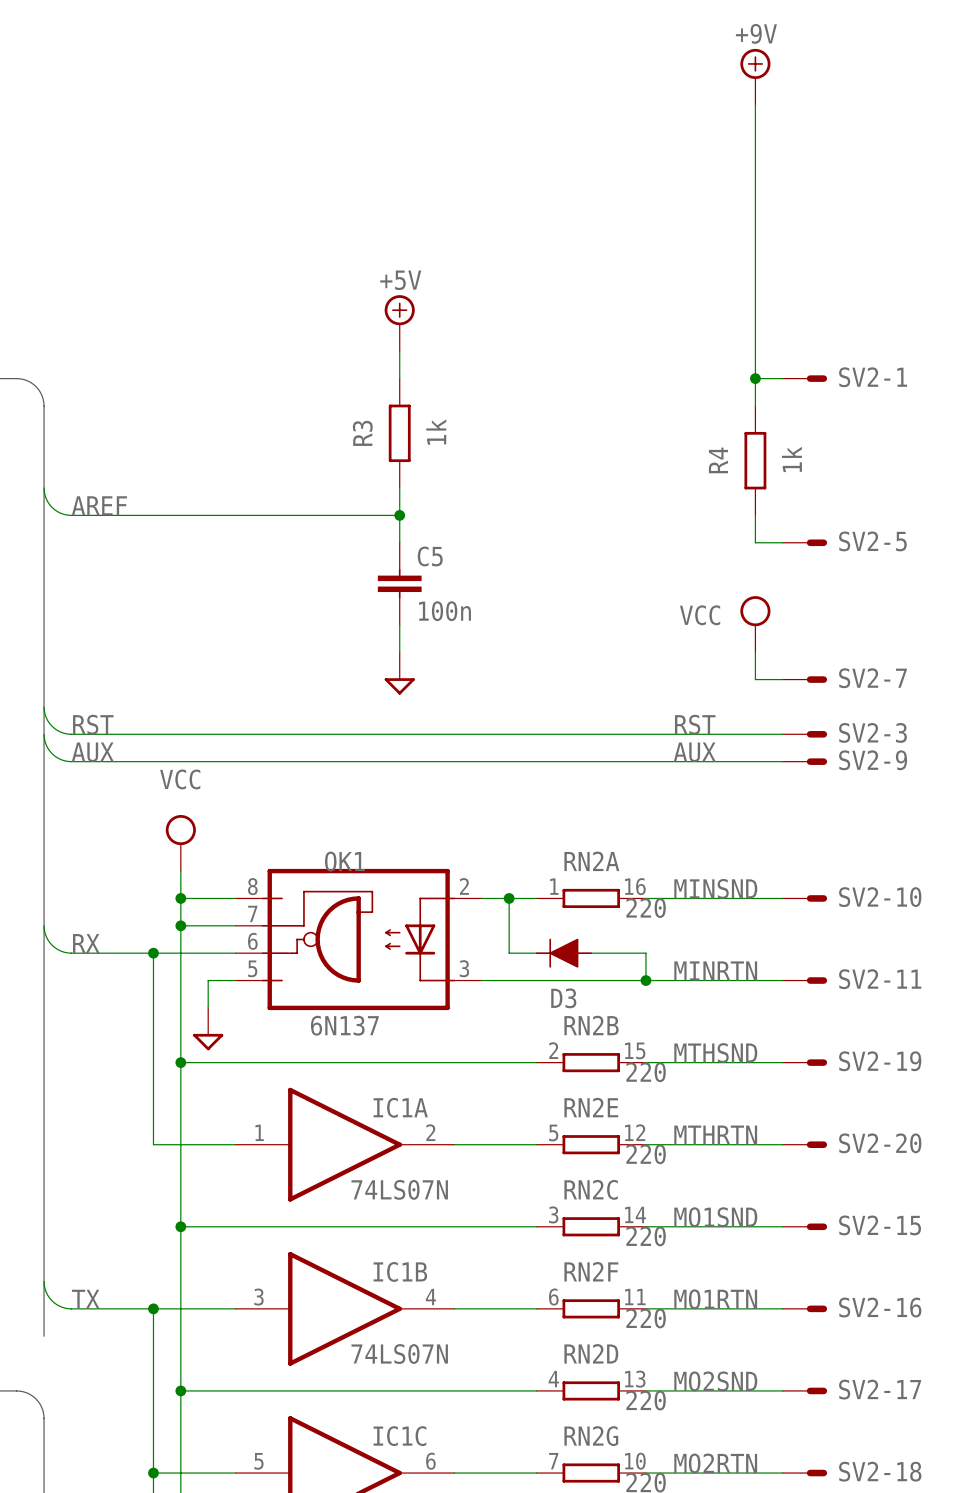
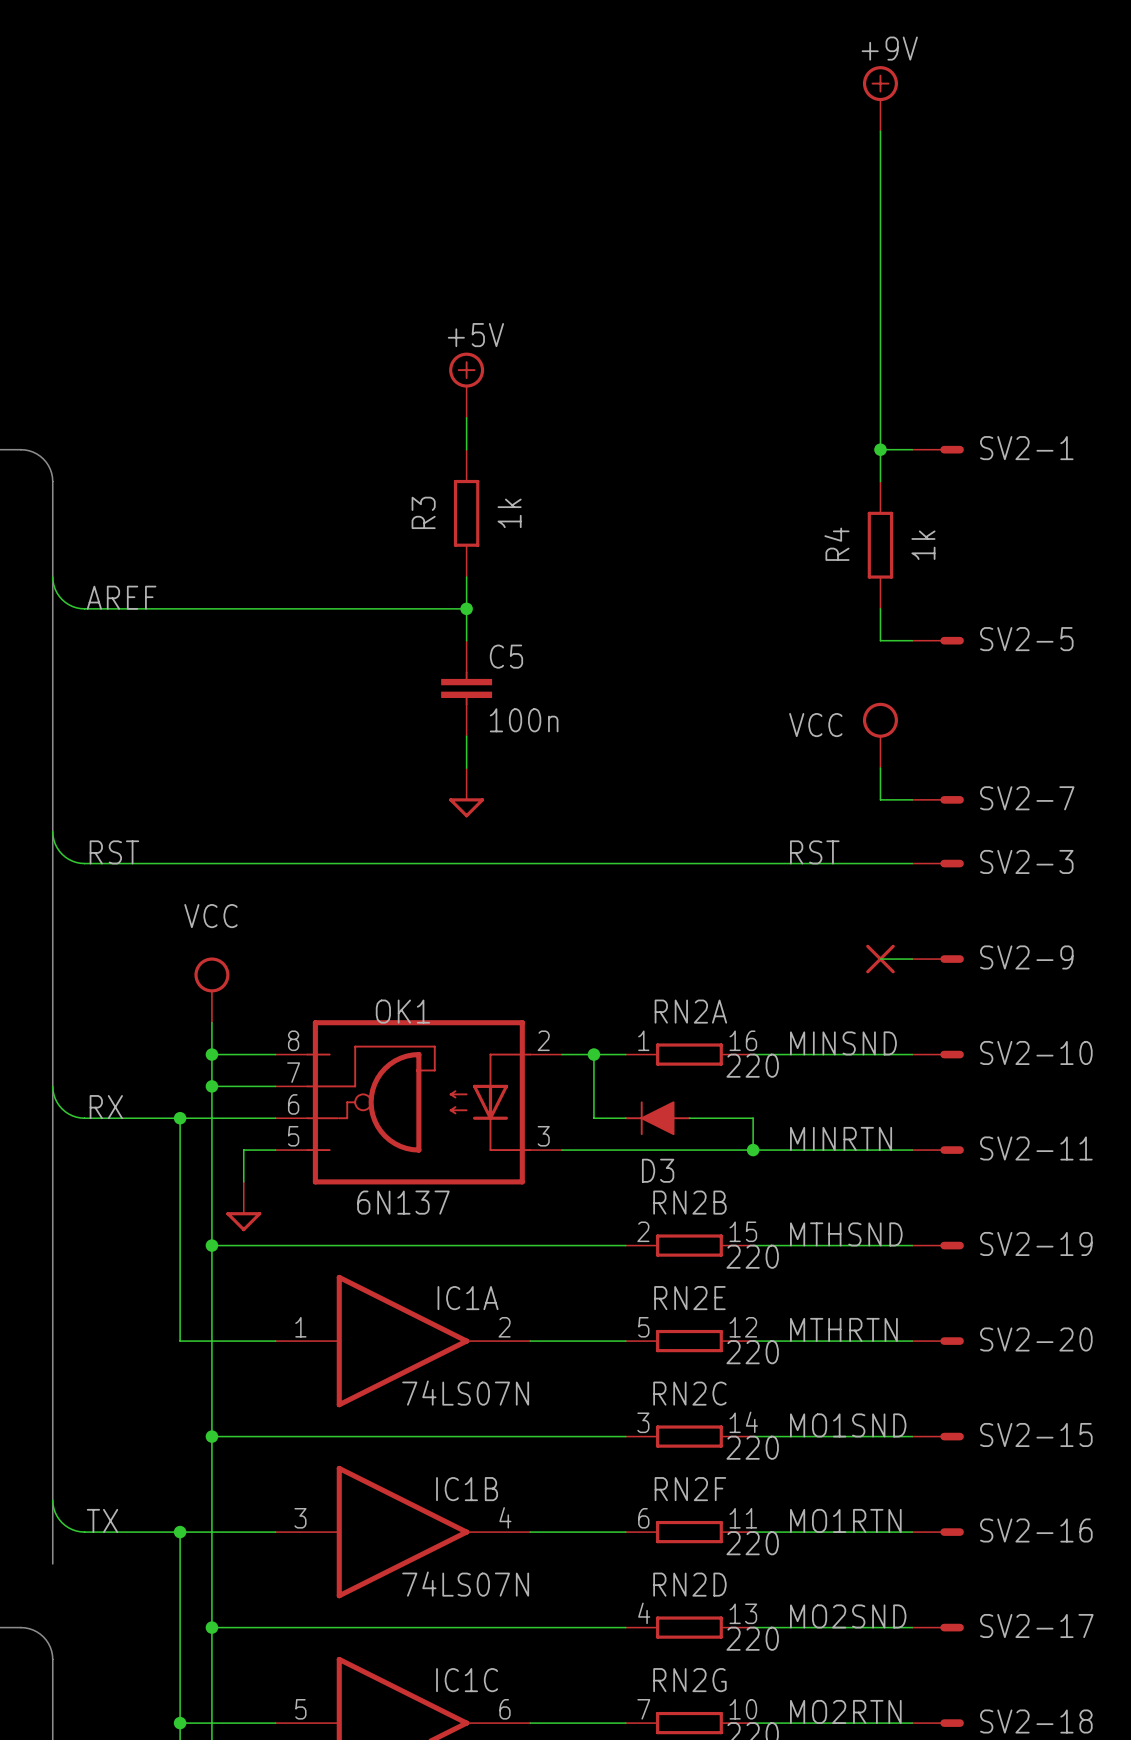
wire: (44, 734) (46, 744) (52, 753) (60, 759) (71, 761) (782, 761) -> none
label: AUX (92, 752) -> none
label: AUX (694, 752) -> none
SV2-9 position: (804, 761) -> (938, 959)
wire: none -> (880, 959) (912, 959)
part: none -> (880, 959)

